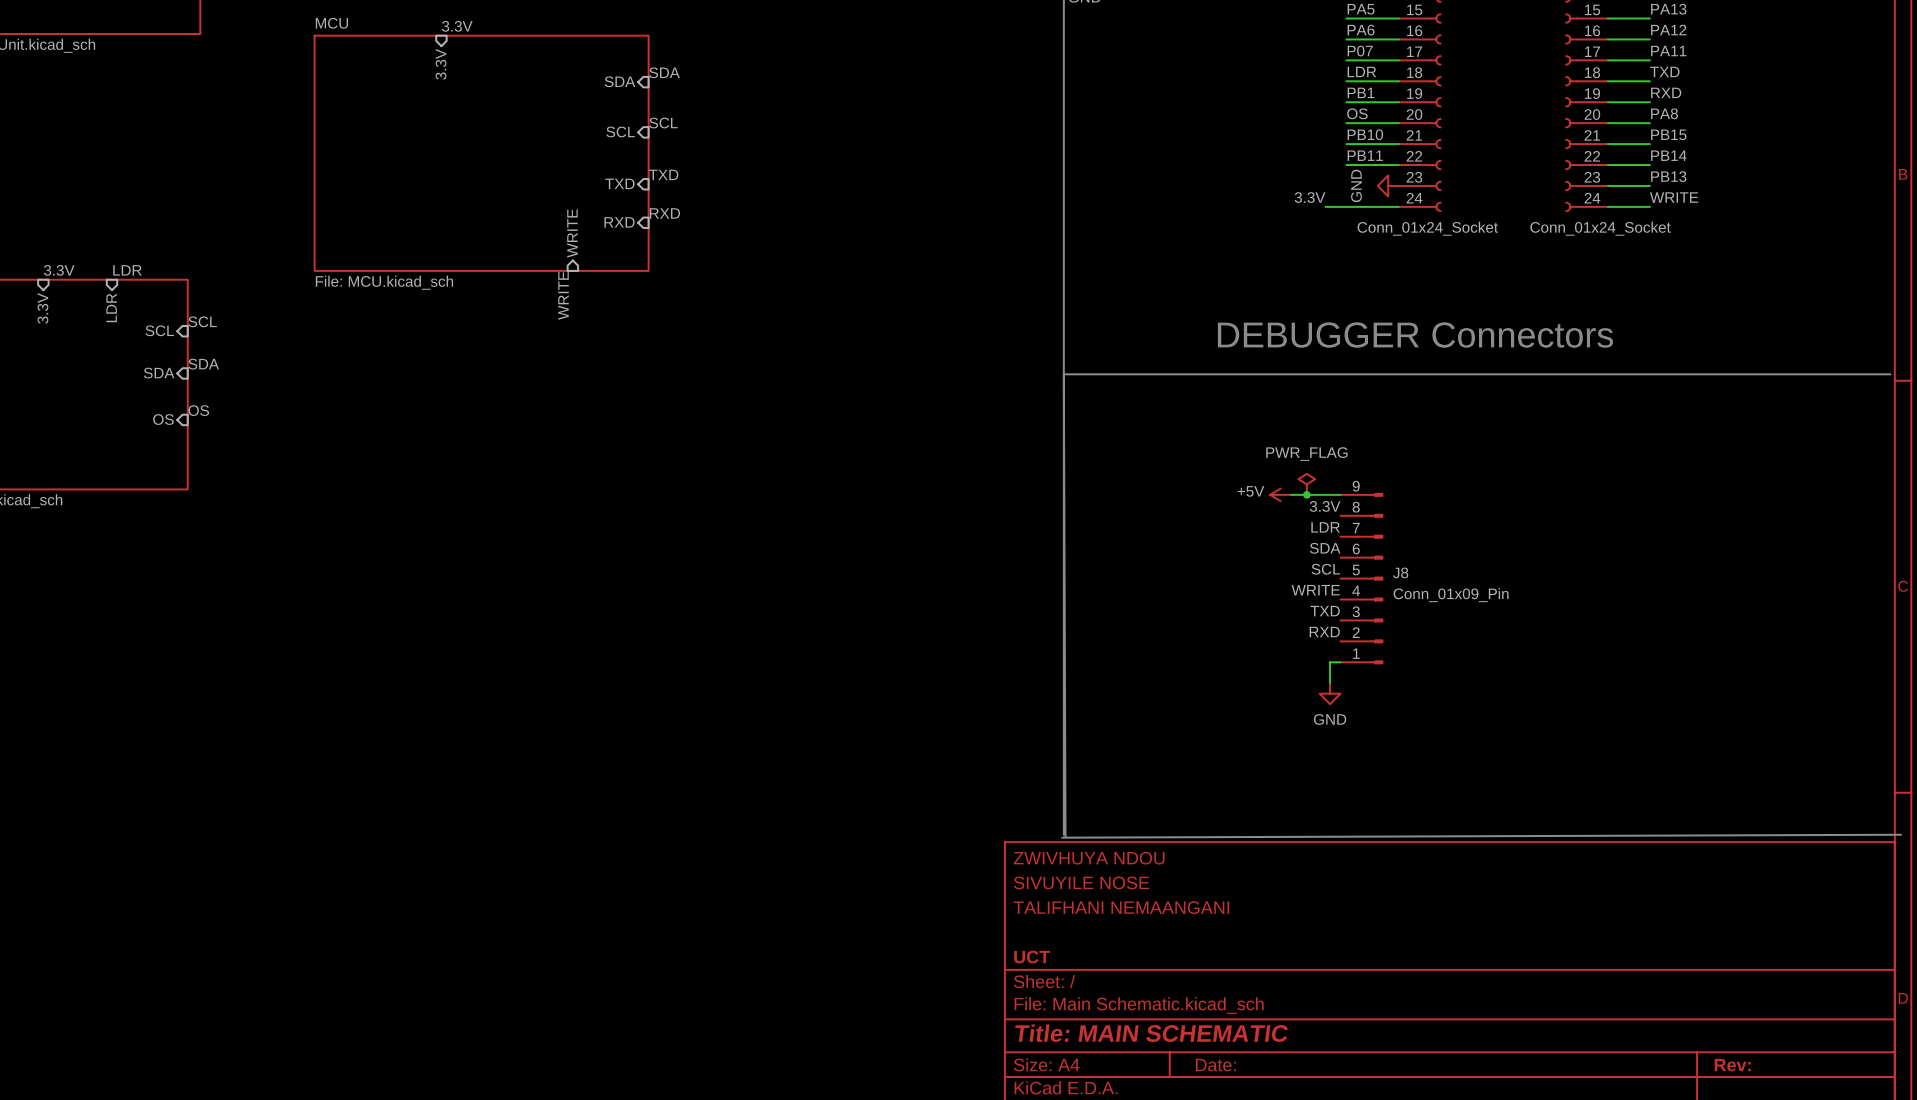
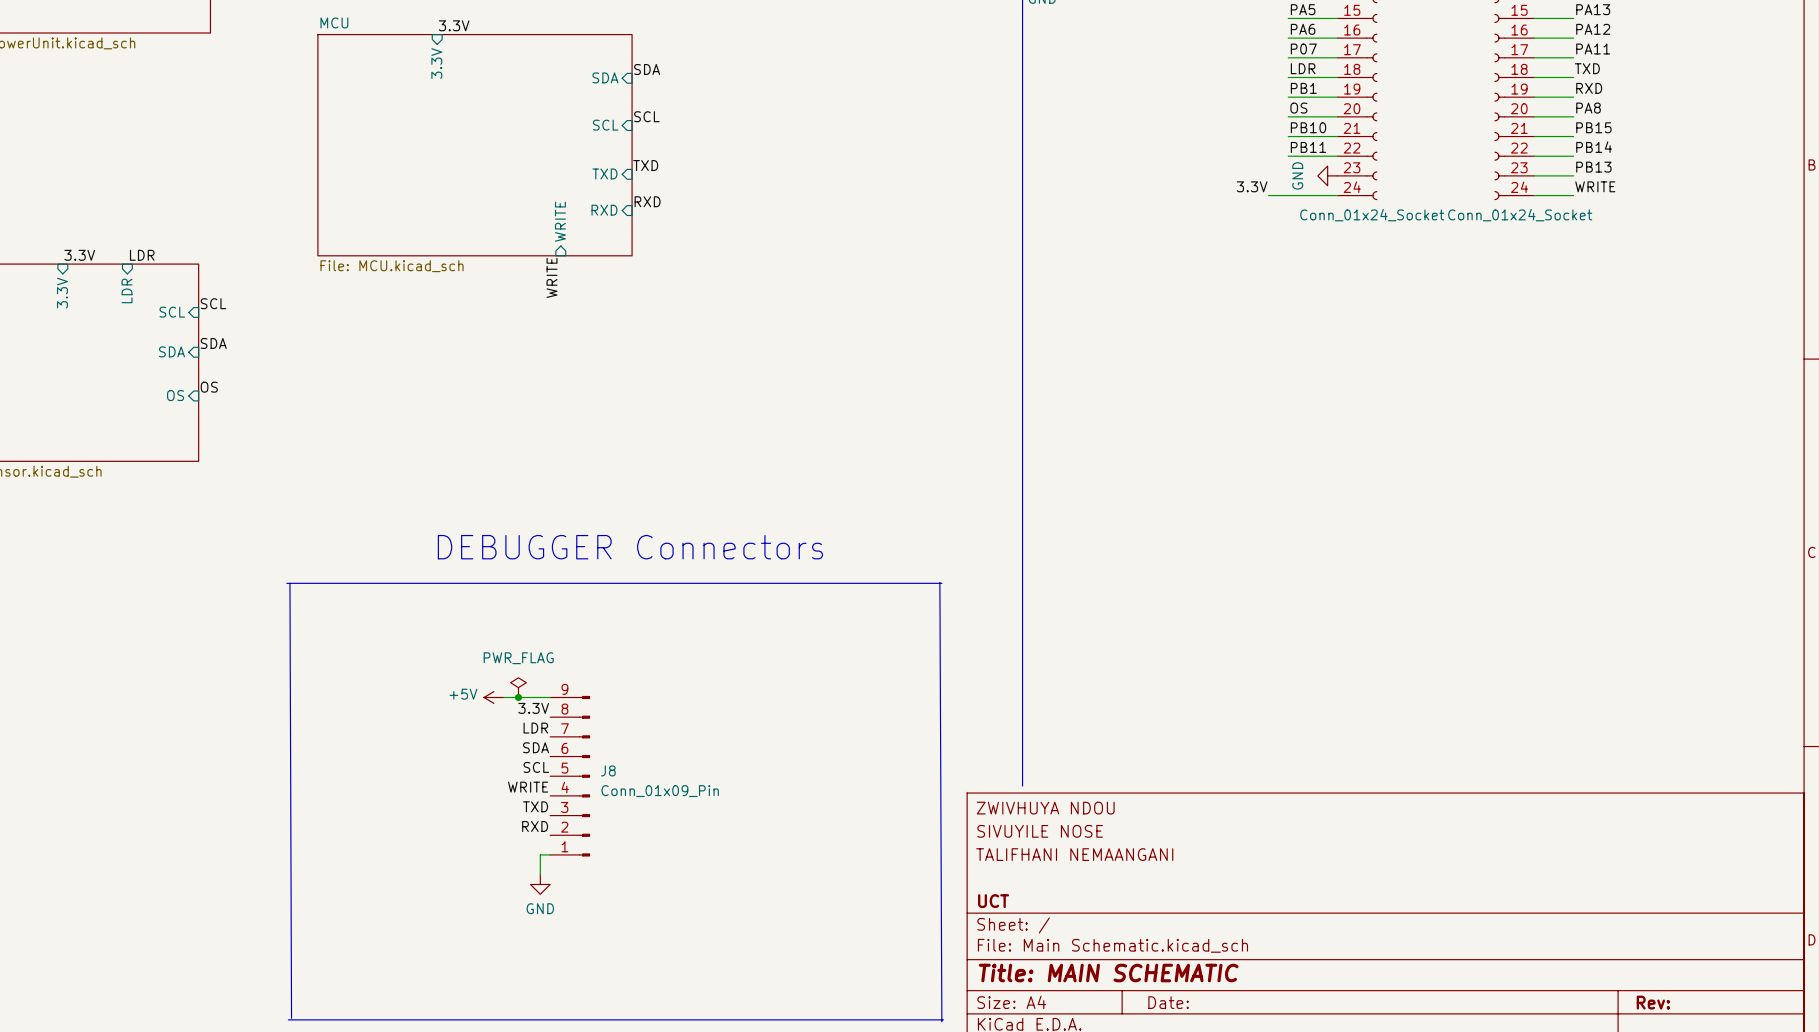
text: DEBUGGER Connectors (1415, 335) -> none
line: (1890, 374) (1063, 374) (1065, 836) -> none
power symbol: PWR_FLAG (1306, 484) -> none
power symbol: +5V (1280, 494) -> none
wire: (1291, 494) (1340, 494) -> none
junction: (1306, 494) -> none
label: 3.3V (1325, 506) -> none
label: LDR (1325, 527) -> none
label: SDA (1325, 548) -> none
label: SCL (1325, 569) -> none
J8 position: (1361, 578) -> (570, 776)
text: none -> DEBUGGER Connectors (630, 547)
label: WRITE (1315, 590) -> none
label: TXD (1325, 611) -> none
line: none -> (939, 582) (941, 1021)
line: none -> (286, 583) (941, 583)
line: none -> (289, 584) (291, 1018)
label: RXD (1324, 632) -> none
wire: (1340, 662) (1330, 662) (1330, 683) -> none
power symbol: GND (1330, 693) -> none
power symbol: none -> PWR_FLAG (518, 687)
power symbol: none -> +5V (493, 697)
wire: none -> (503, 697) (550, 697)
junction: none -> (518, 697)
label: none -> 3.3V (533, 708)
label: none -> LDR (535, 728)
label: none -> SDA (536, 747)
label: none -> SCL (536, 767)
line: (1901, 834) (1062, 837) -> none
label: none -> WRITE (528, 787)
label: none -> TXD (535, 806)
label: none -> RXD (535, 826)
wire: none -> (550, 854) (540, 854) (540, 874)
power symbol: none -> GND (540, 884)
line: none -> (288, 1019) (943, 1019)

